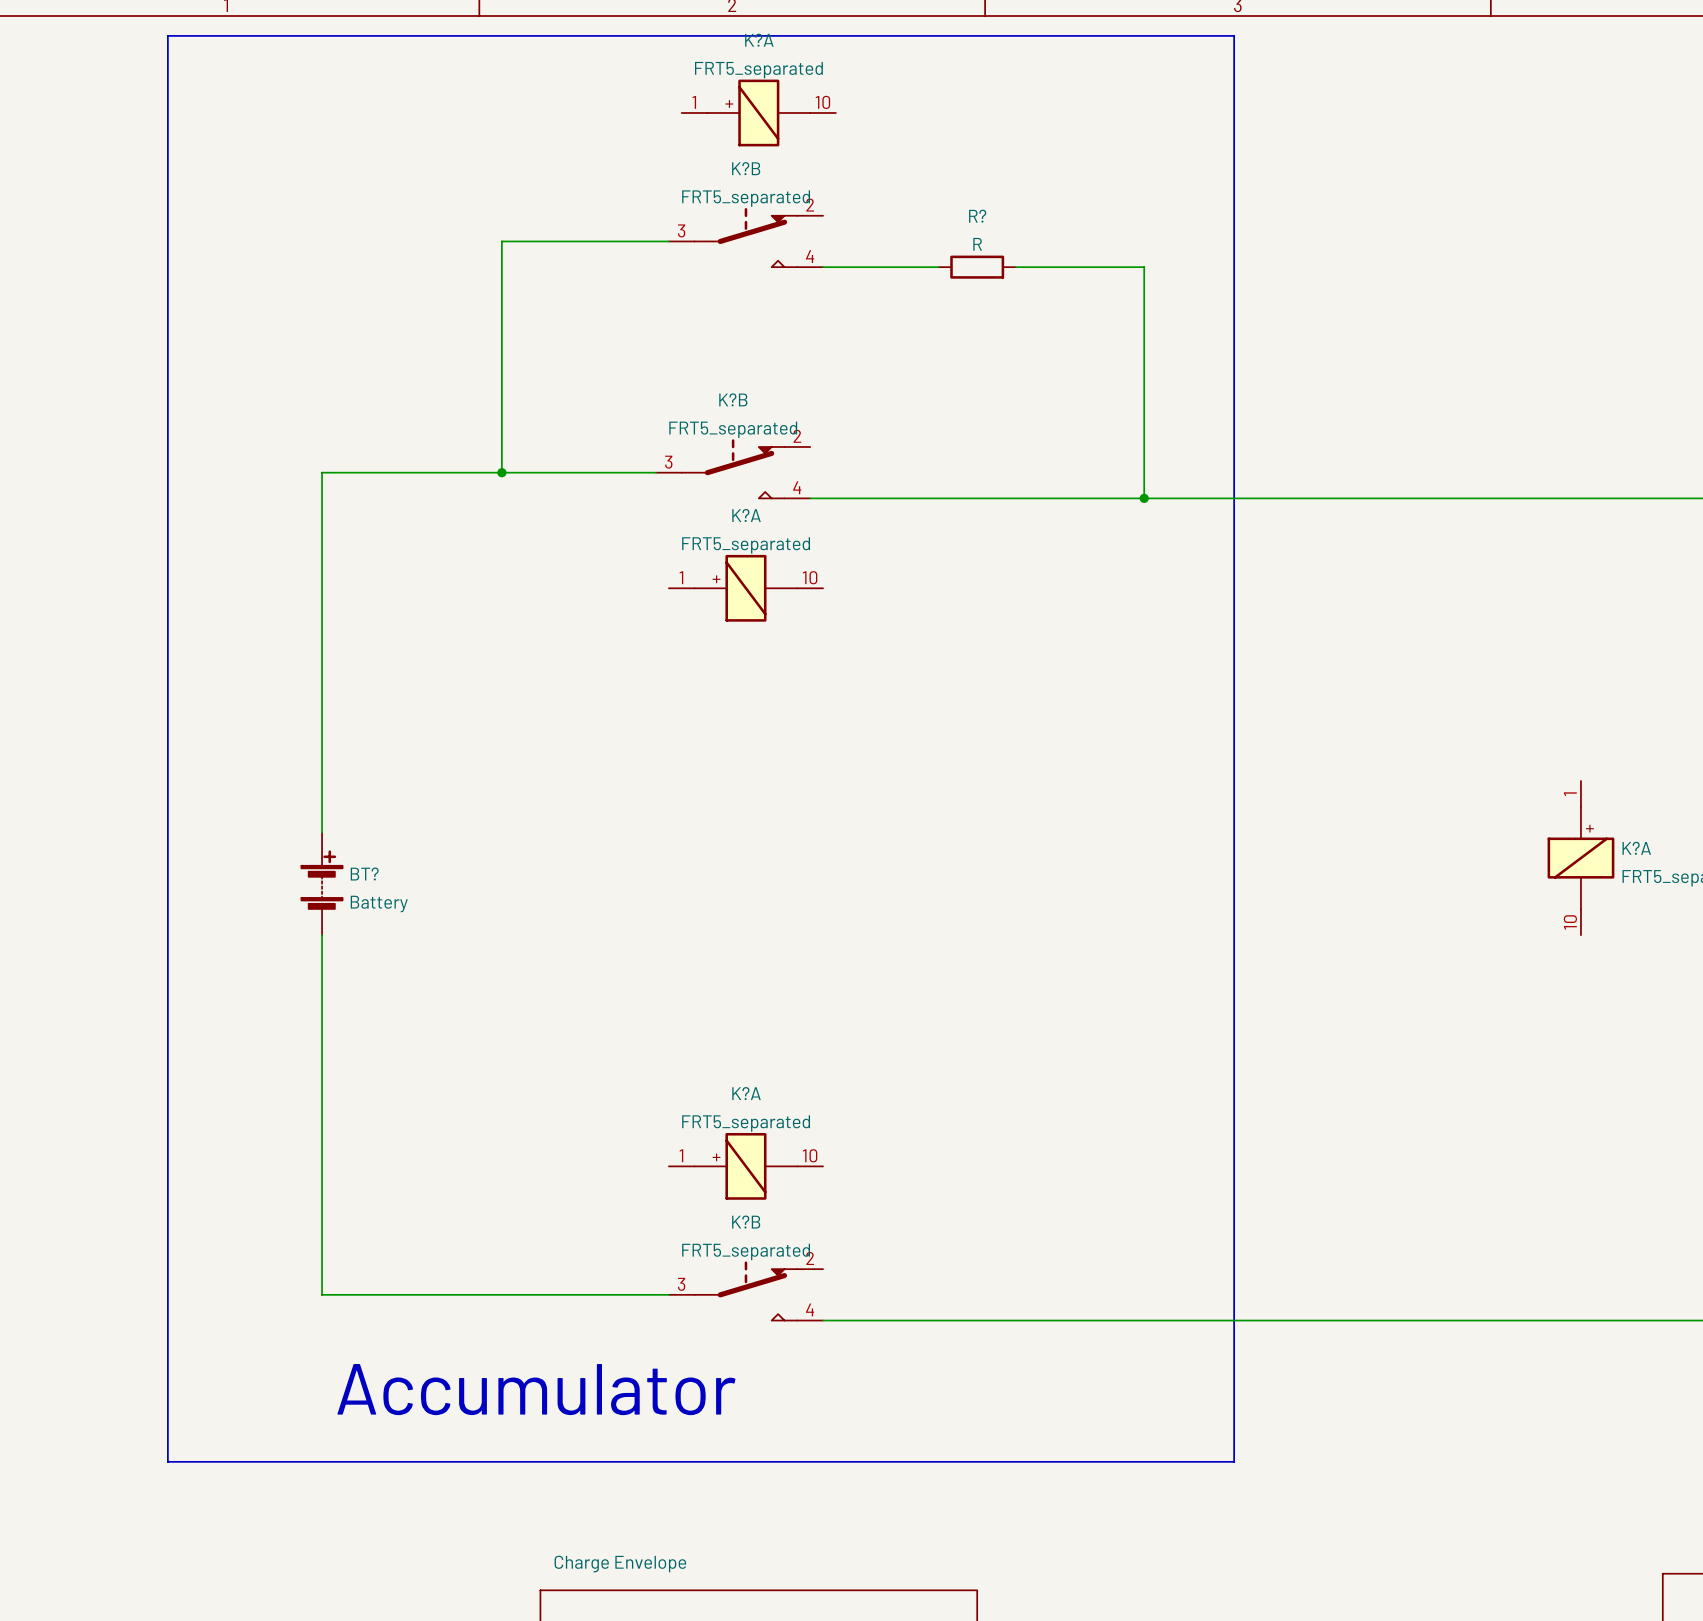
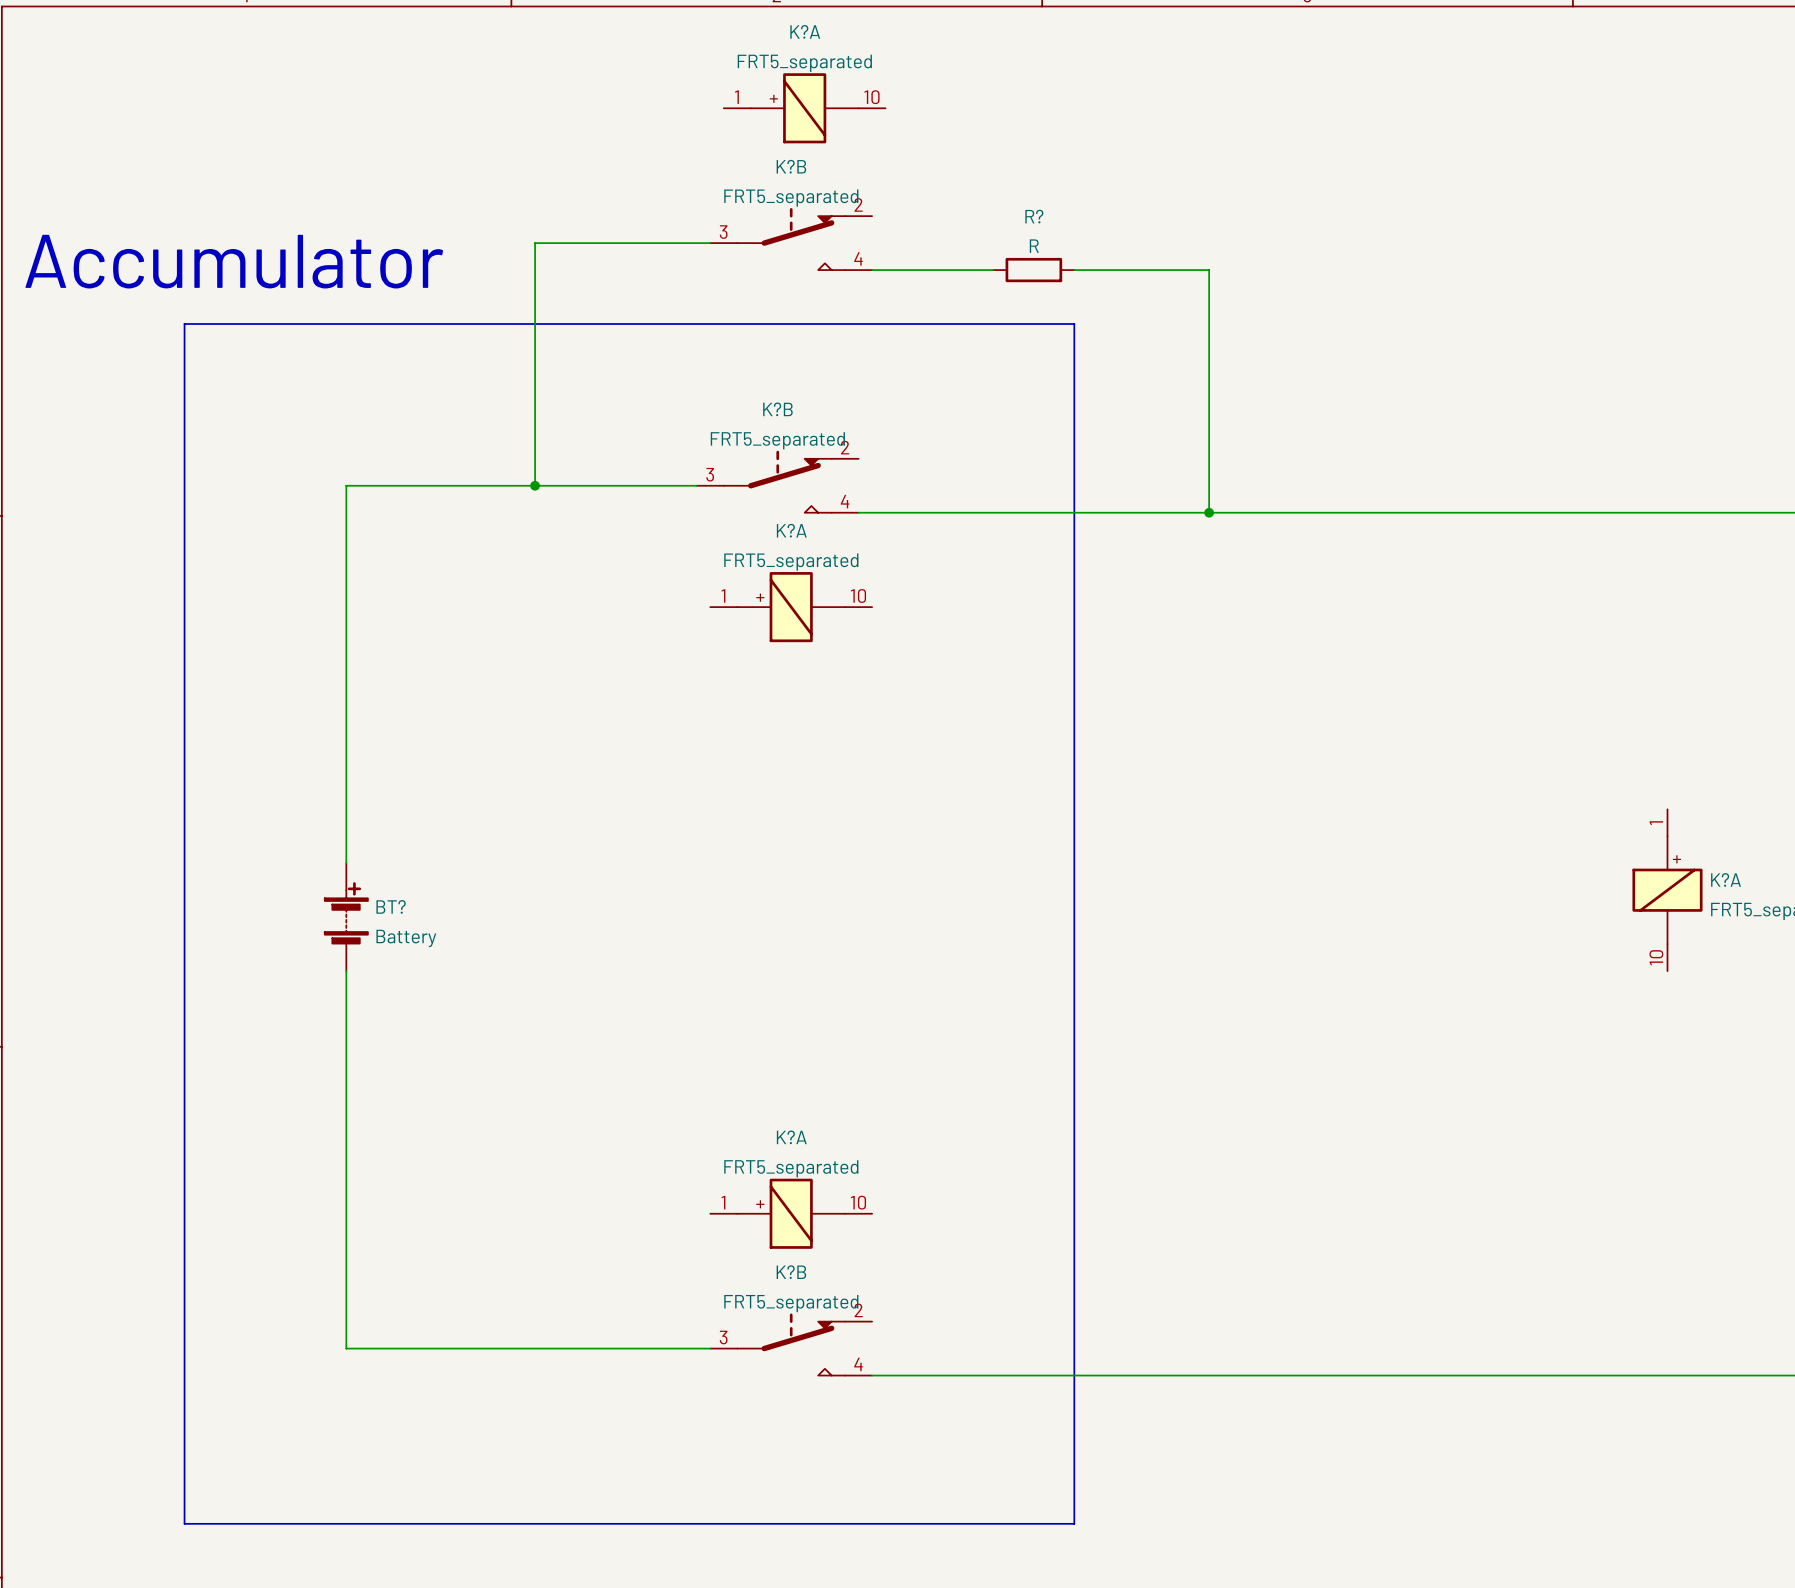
text: none -> Accumulator (234, 261)
line: (167, 318) (167, 35) (1234, 35) (1234, 1461) (1015, 1461) -> (184, 323) (1074, 323) (1074, 1523)
text: Accumulator (536, 1389) -> none

